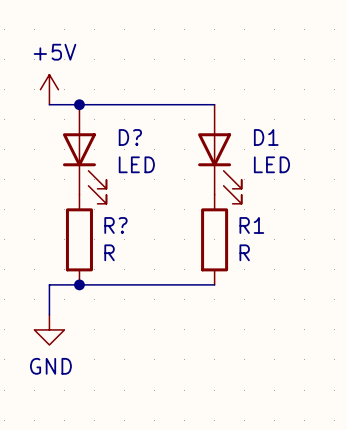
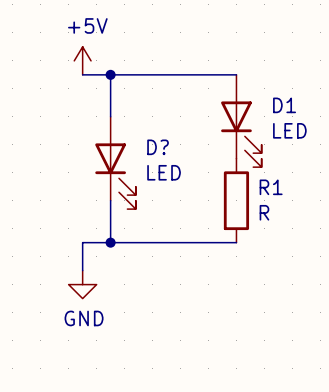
D? position: (84, 154) -> (115, 162)
wire: none -> (110, 200) (110, 242)
R?: R (79, 239) -> none

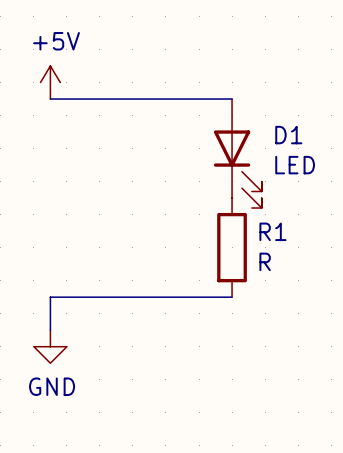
wire: (110, 74) (110, 116) -> none
junction: (110, 74) -> none
D?: LED (115, 162) -> none
wire: (110, 200) (110, 242) -> none
junction: (110, 242) -> none

